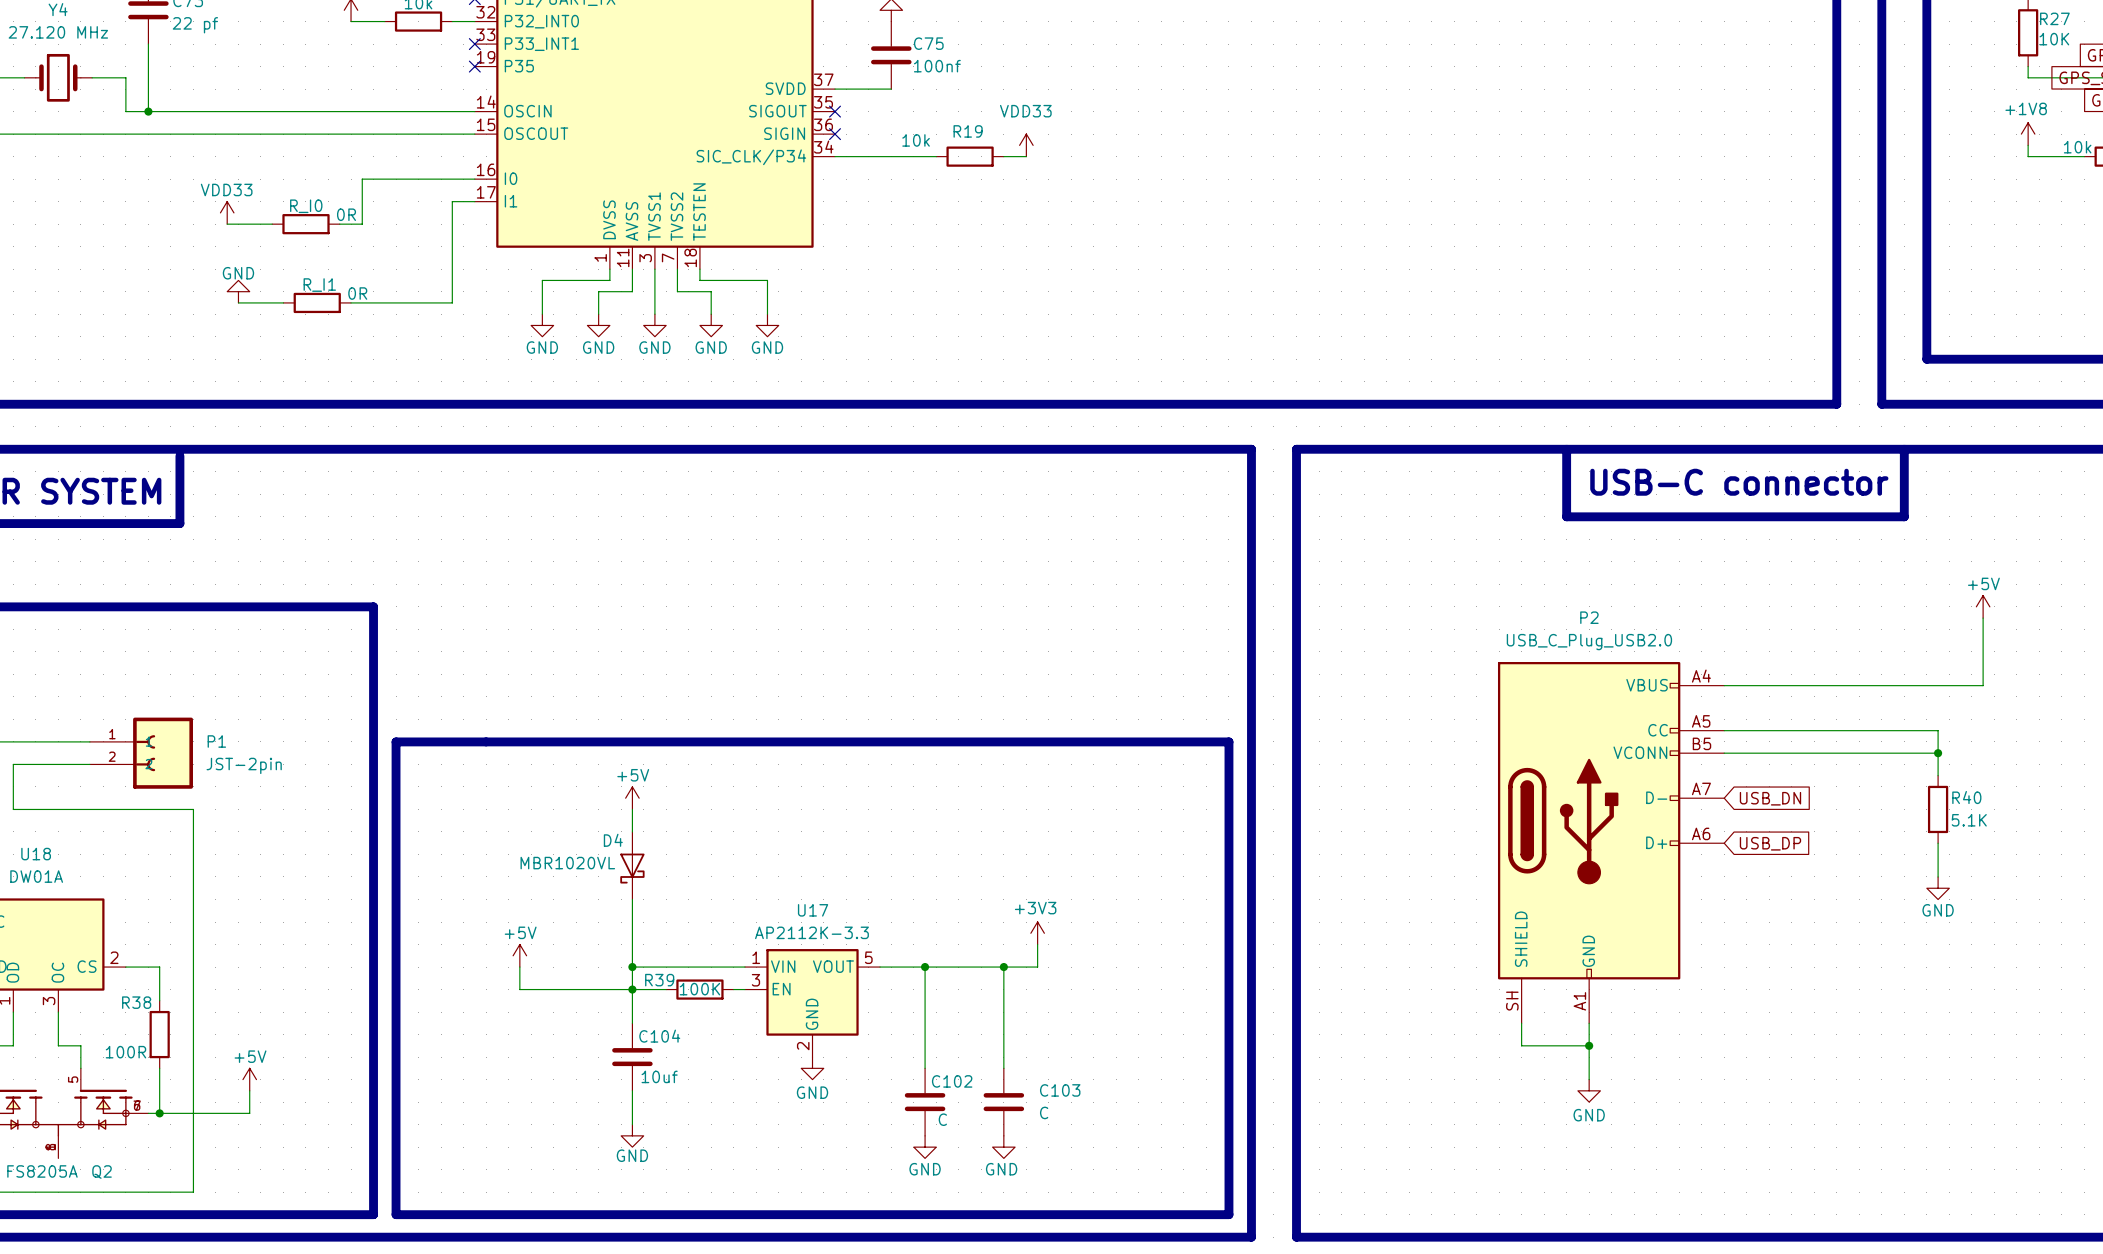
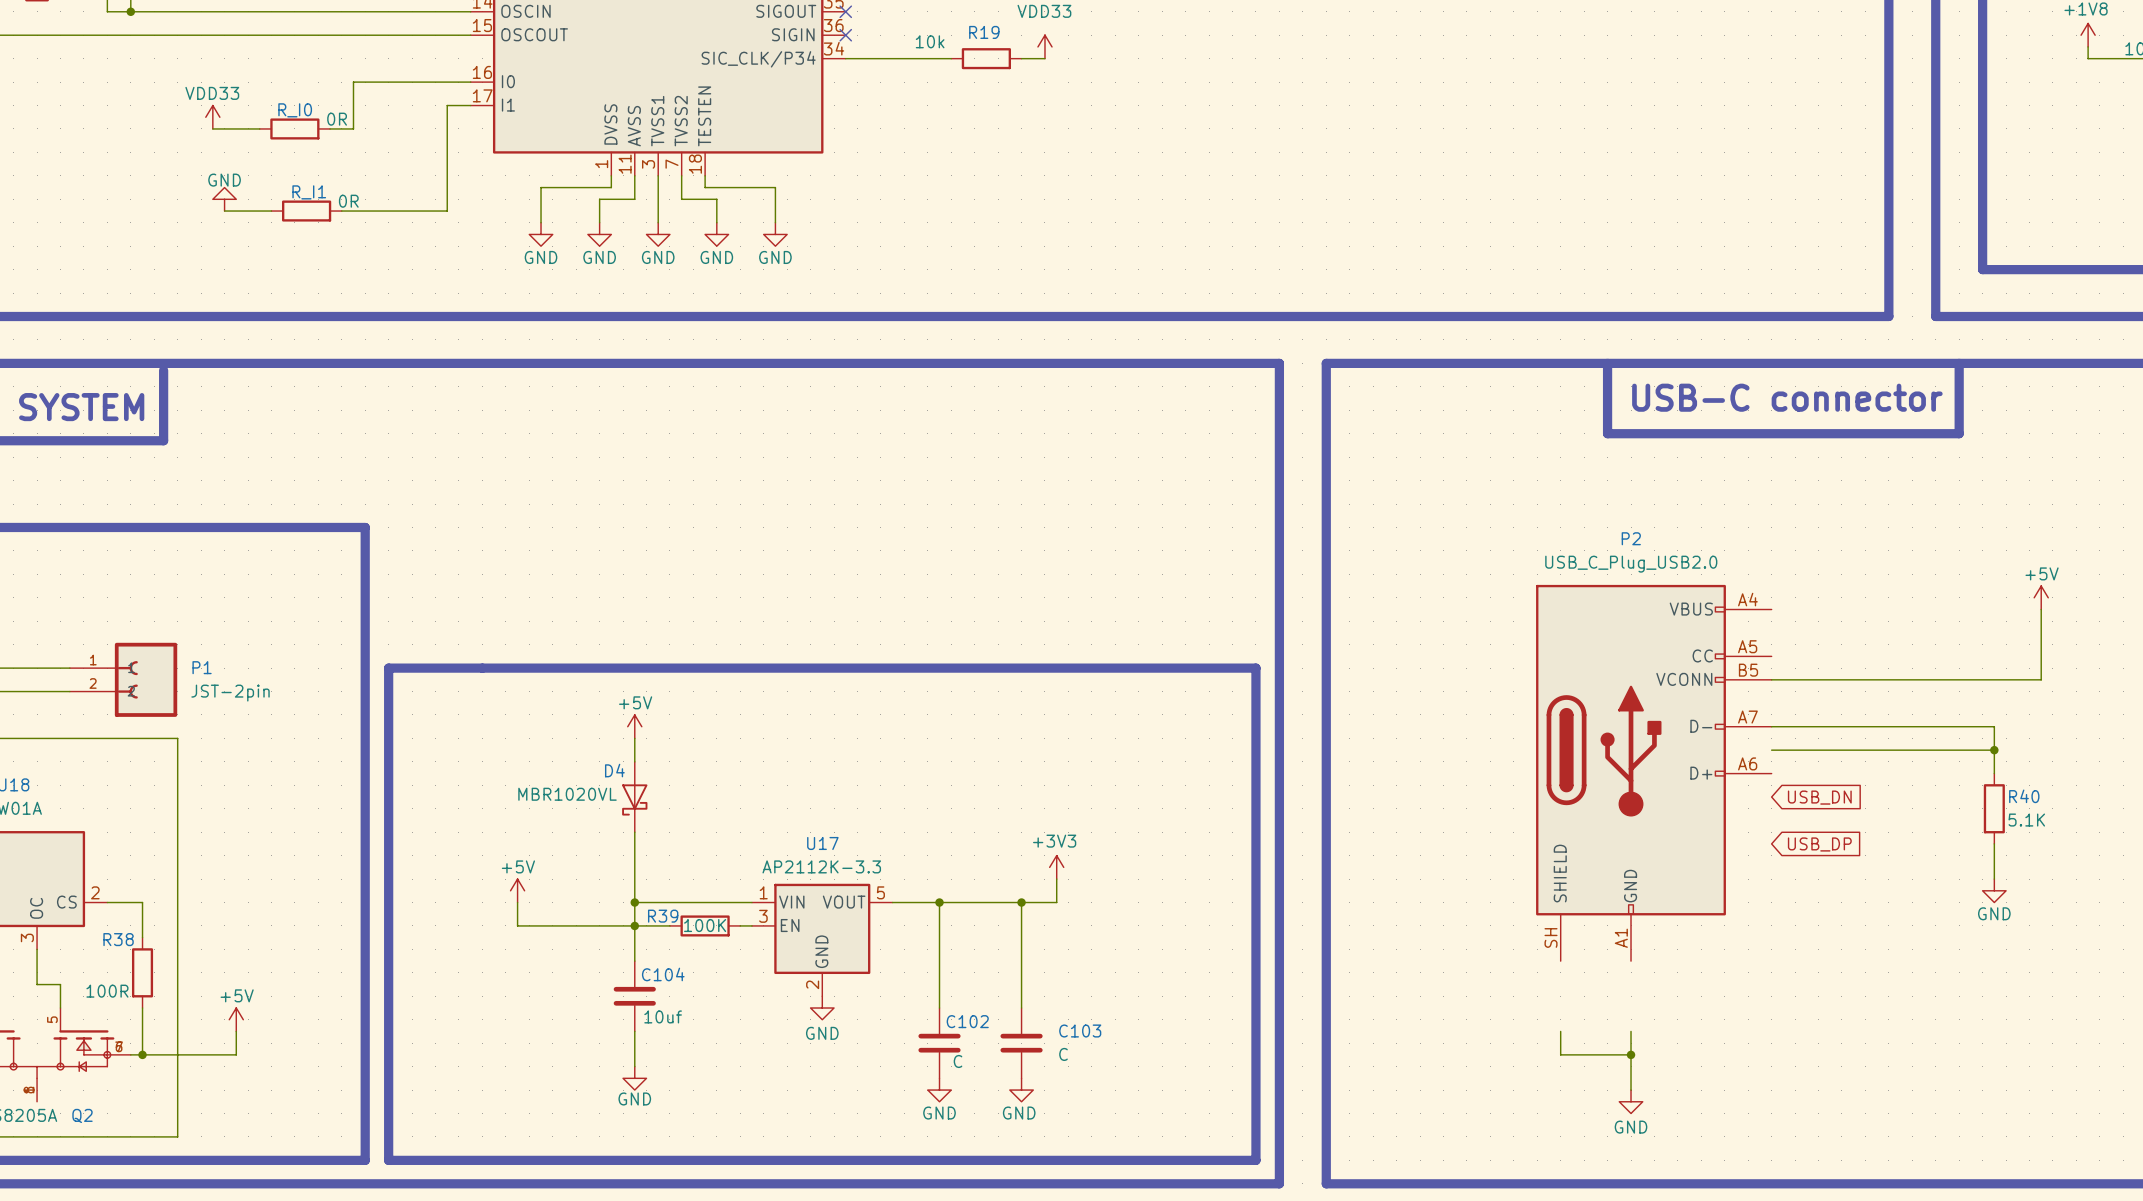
power symbol position: +5V (1983, 606) -> +5V (2041, 597)
wire: (1983, 618) (1983, 685) (1724, 685) -> none
wire: none -> (2041, 609) (2041, 679) (1994, 679)
wire: (1724, 730) (1938, 730) (1938, 775) -> none
junction: (1938, 753) -> none
global label position: USB_DN (1770, 798) -> USB_DN (1819, 797)
R40 position: (1938, 809) -> (1994, 808)
wire: none -> (1771, 750) (1994, 750)
junction: none -> (1994, 750)
global label position: USB_DP (1770, 843) -> USB_DP (1819, 844)
wire: (1938, 843) (1938, 876) -> (1994, 773) (1994, 726) (1771, 726)
power symbol position: GND (1938, 888) -> GND (1994, 890)
wire: none -> (1994, 843) (1994, 879)
wire: (1521, 1023) (1521, 1045) (1589, 1045) -> (1560, 1031) (1560, 1054) (1631, 1054)
wire: (1589, 1023) (1589, 1079) -> (1631, 1031) (1631, 1090)
junction: (1589, 1045) -> none
power symbol position: GND (1589, 1090) -> GND (1631, 1101)
junction: none -> (1631, 1054)

